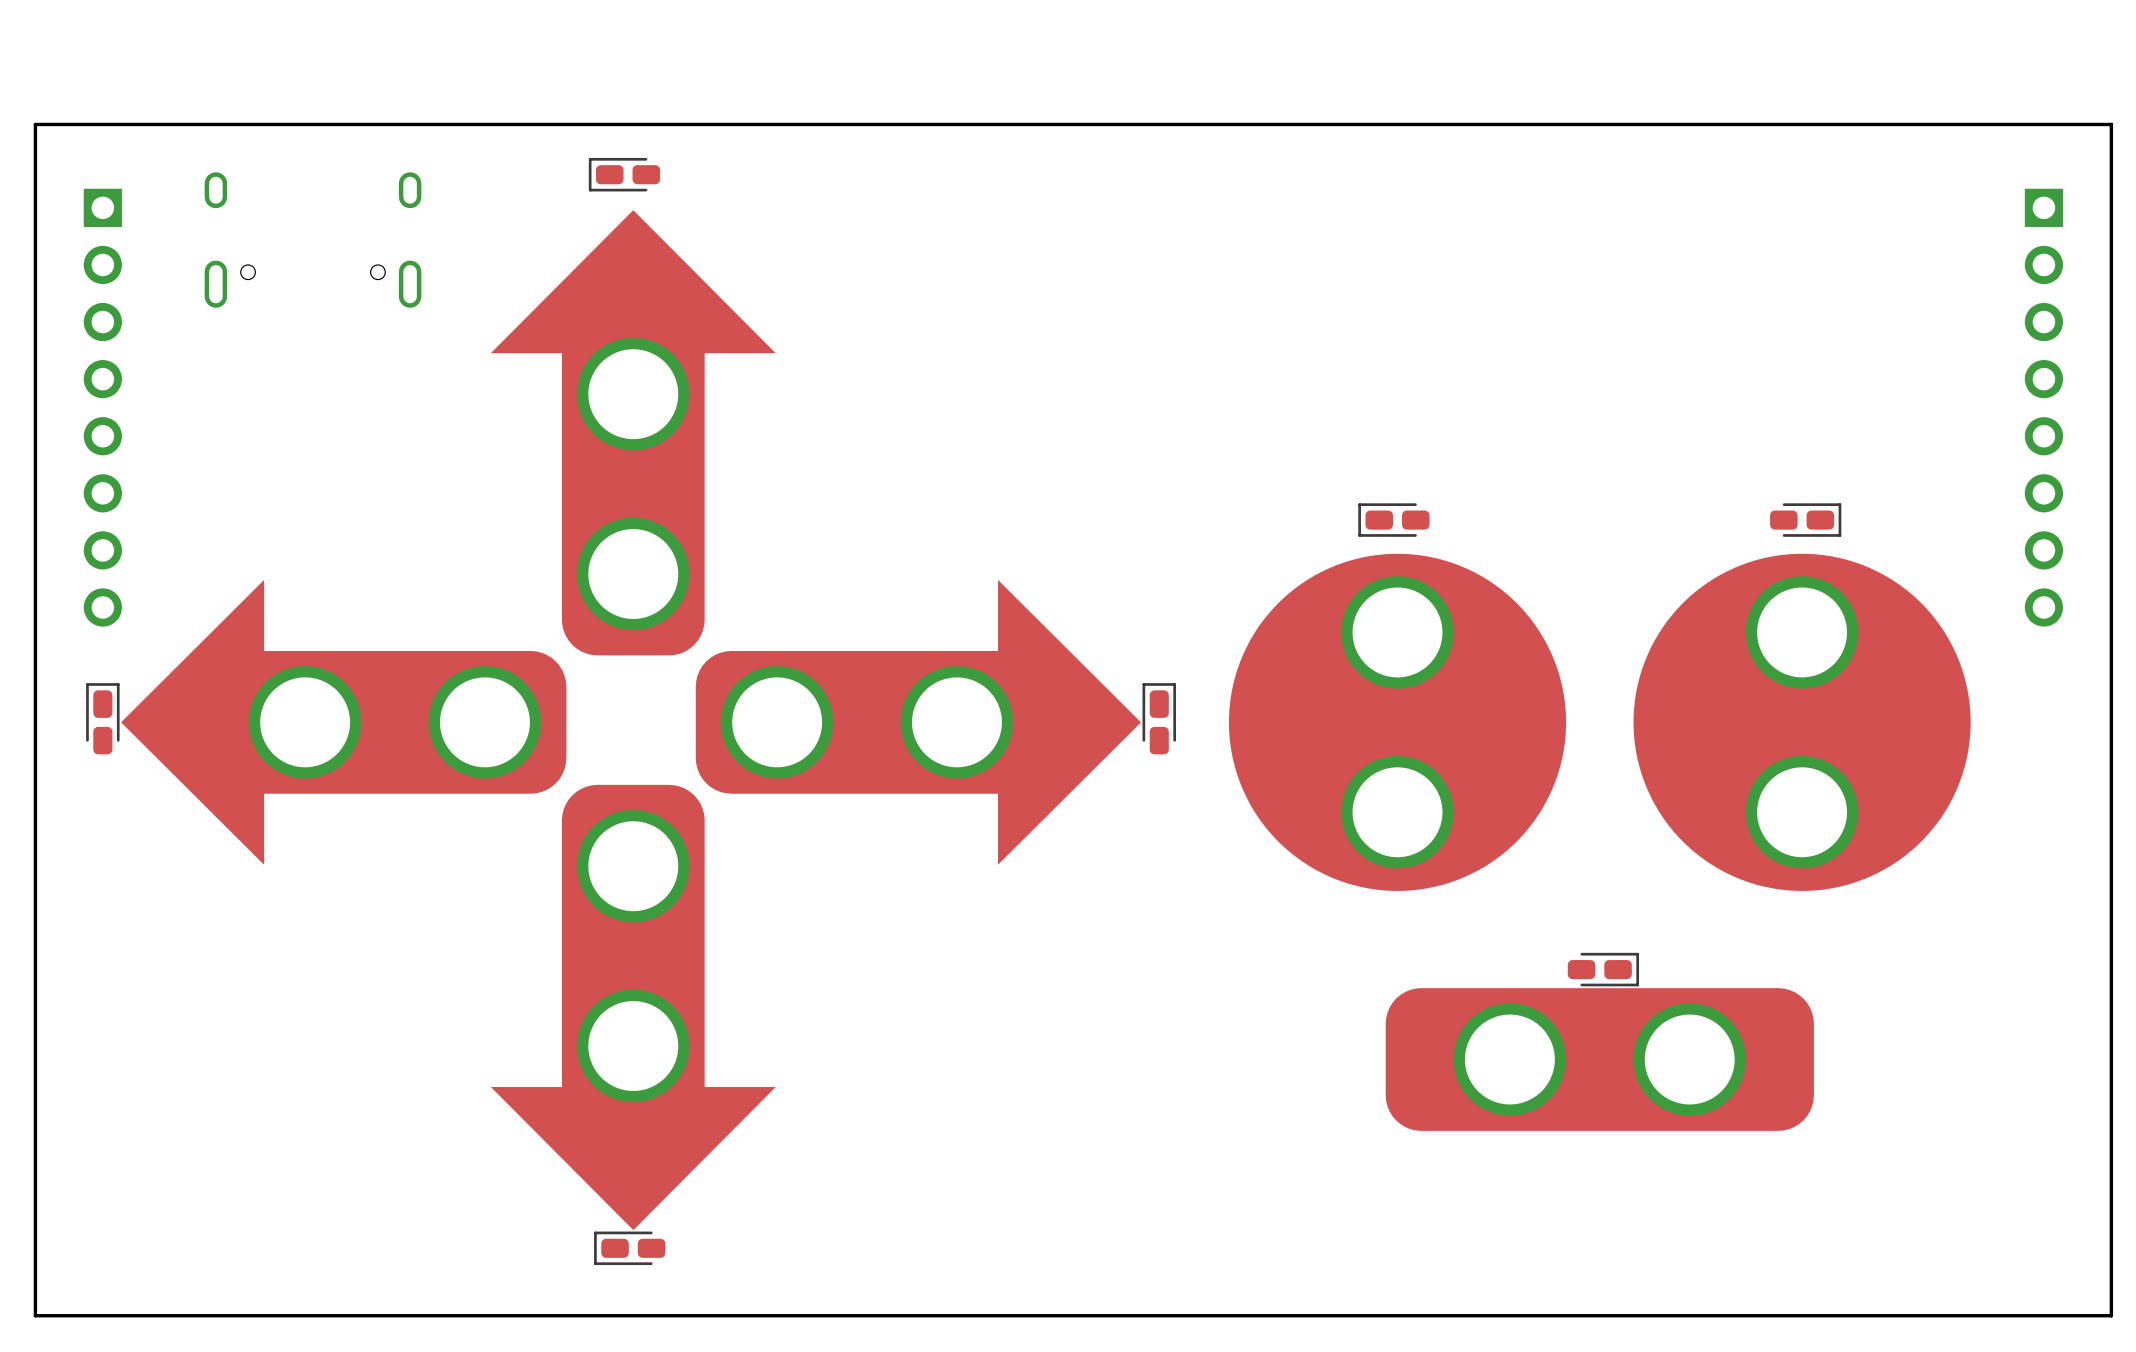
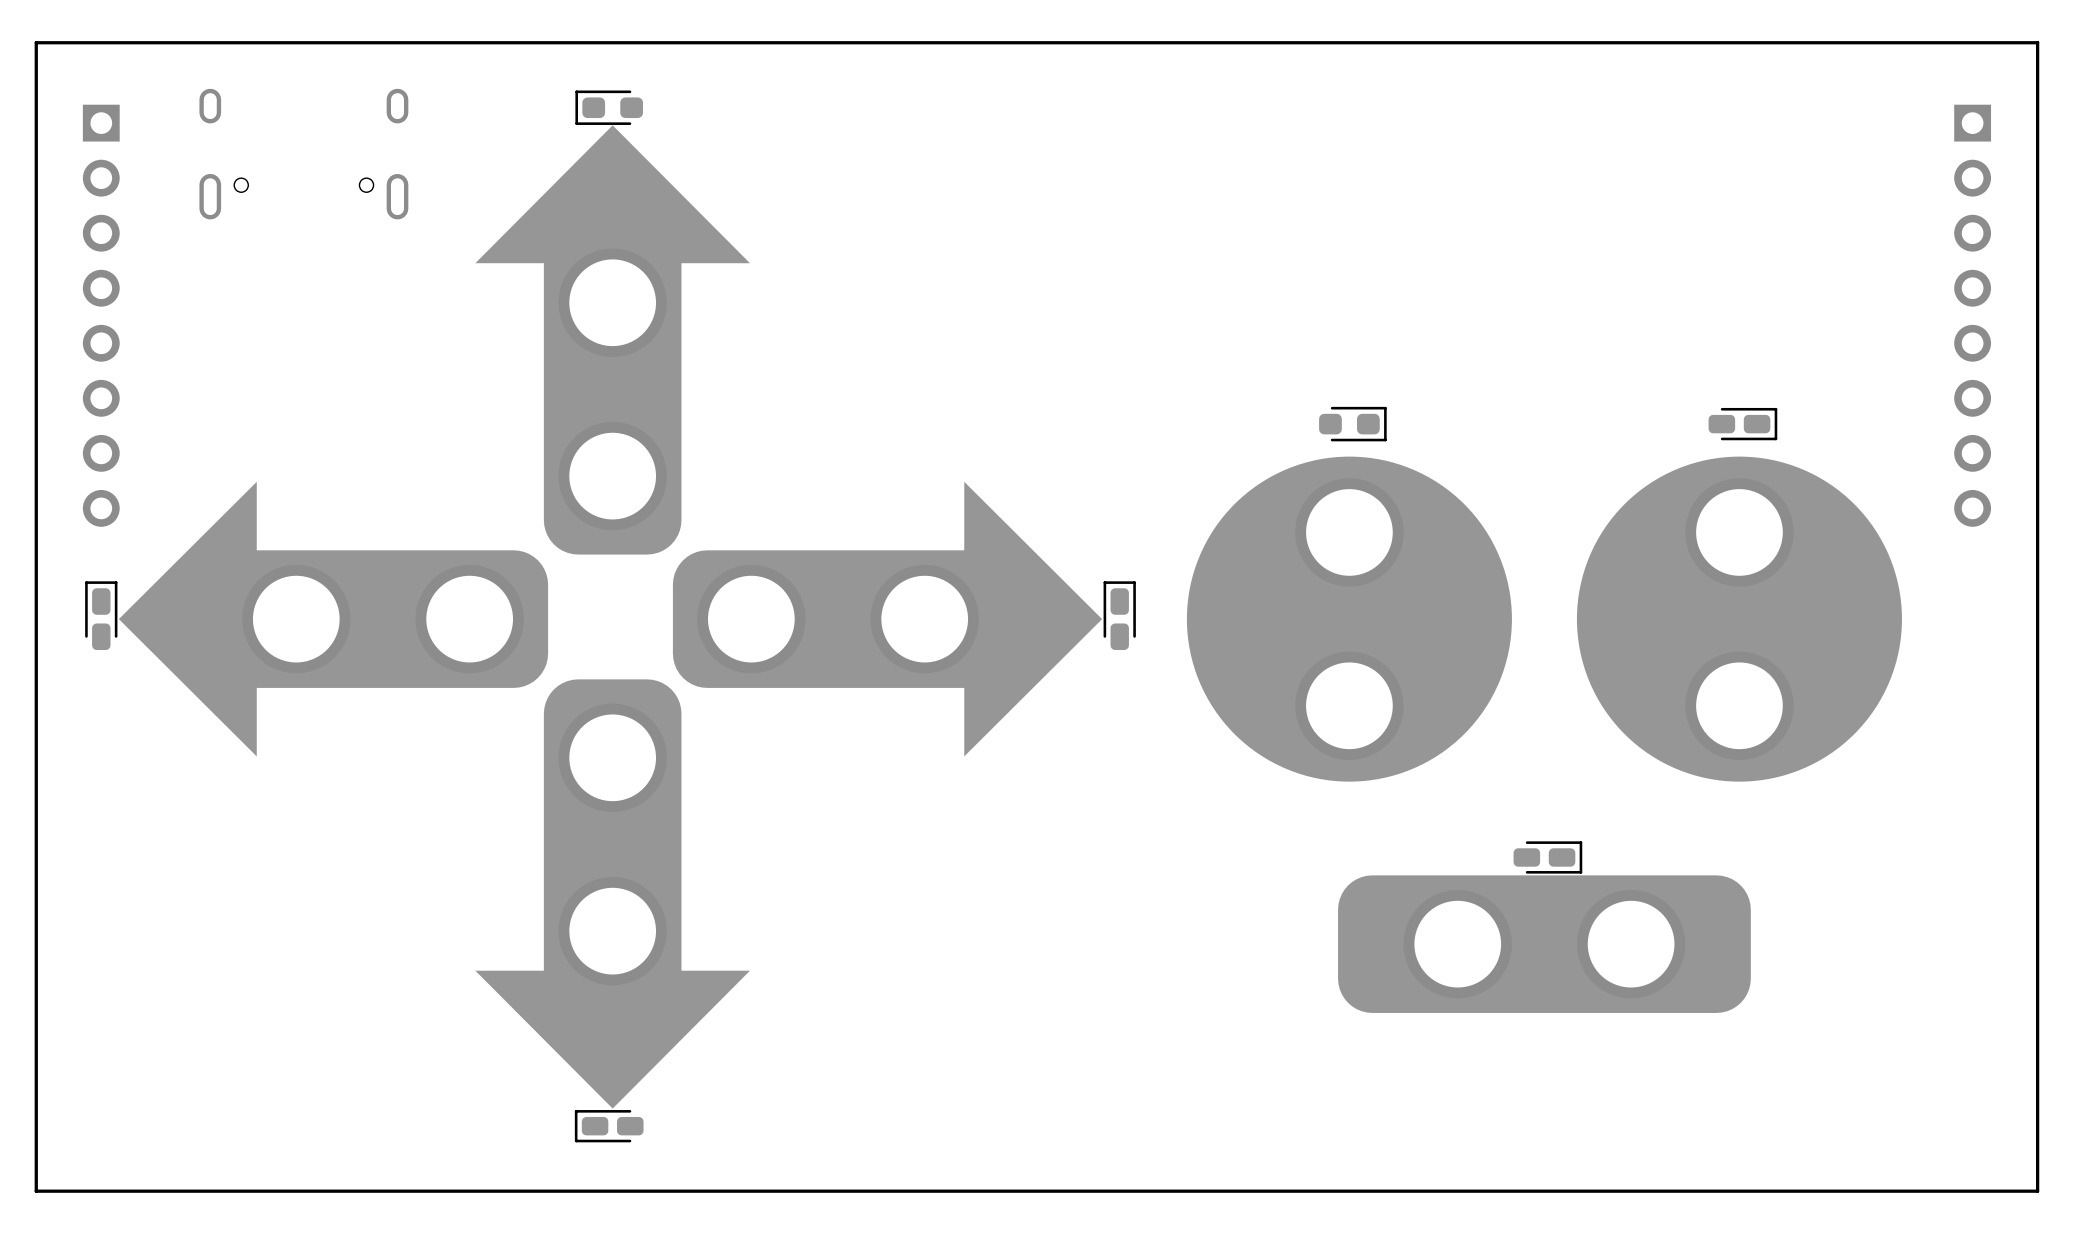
part footprint: [588, 157, 661, 192] -> [575, 90, 644, 125]
part footprint: [1358, 503, 1430, 537] -> [1319, 406, 1387, 442]

